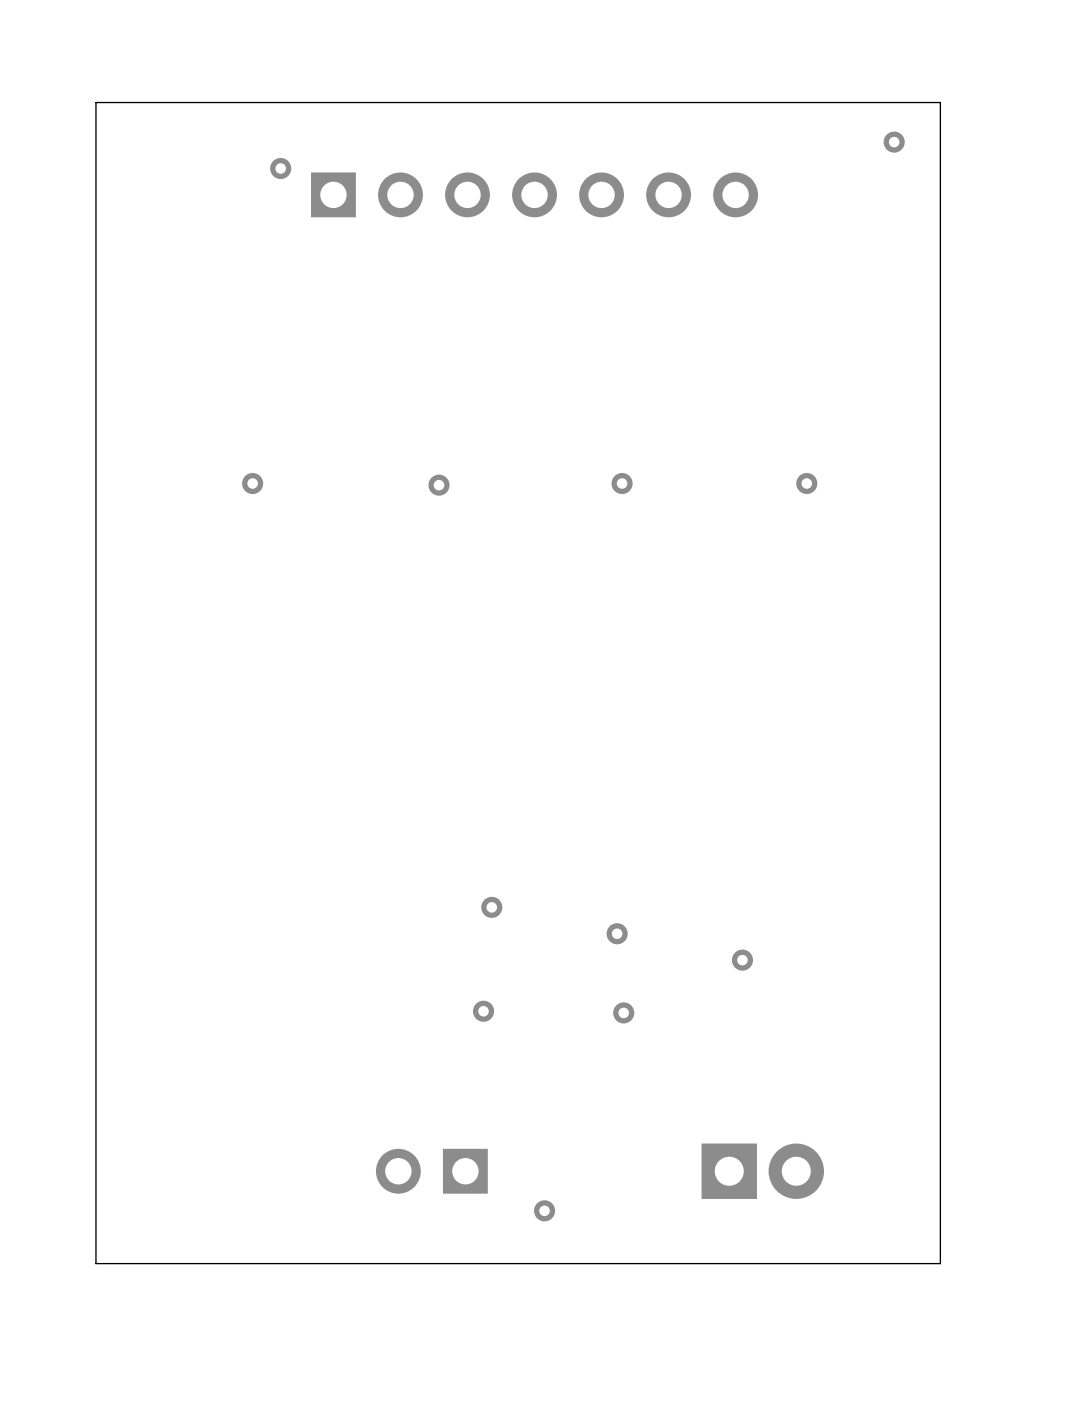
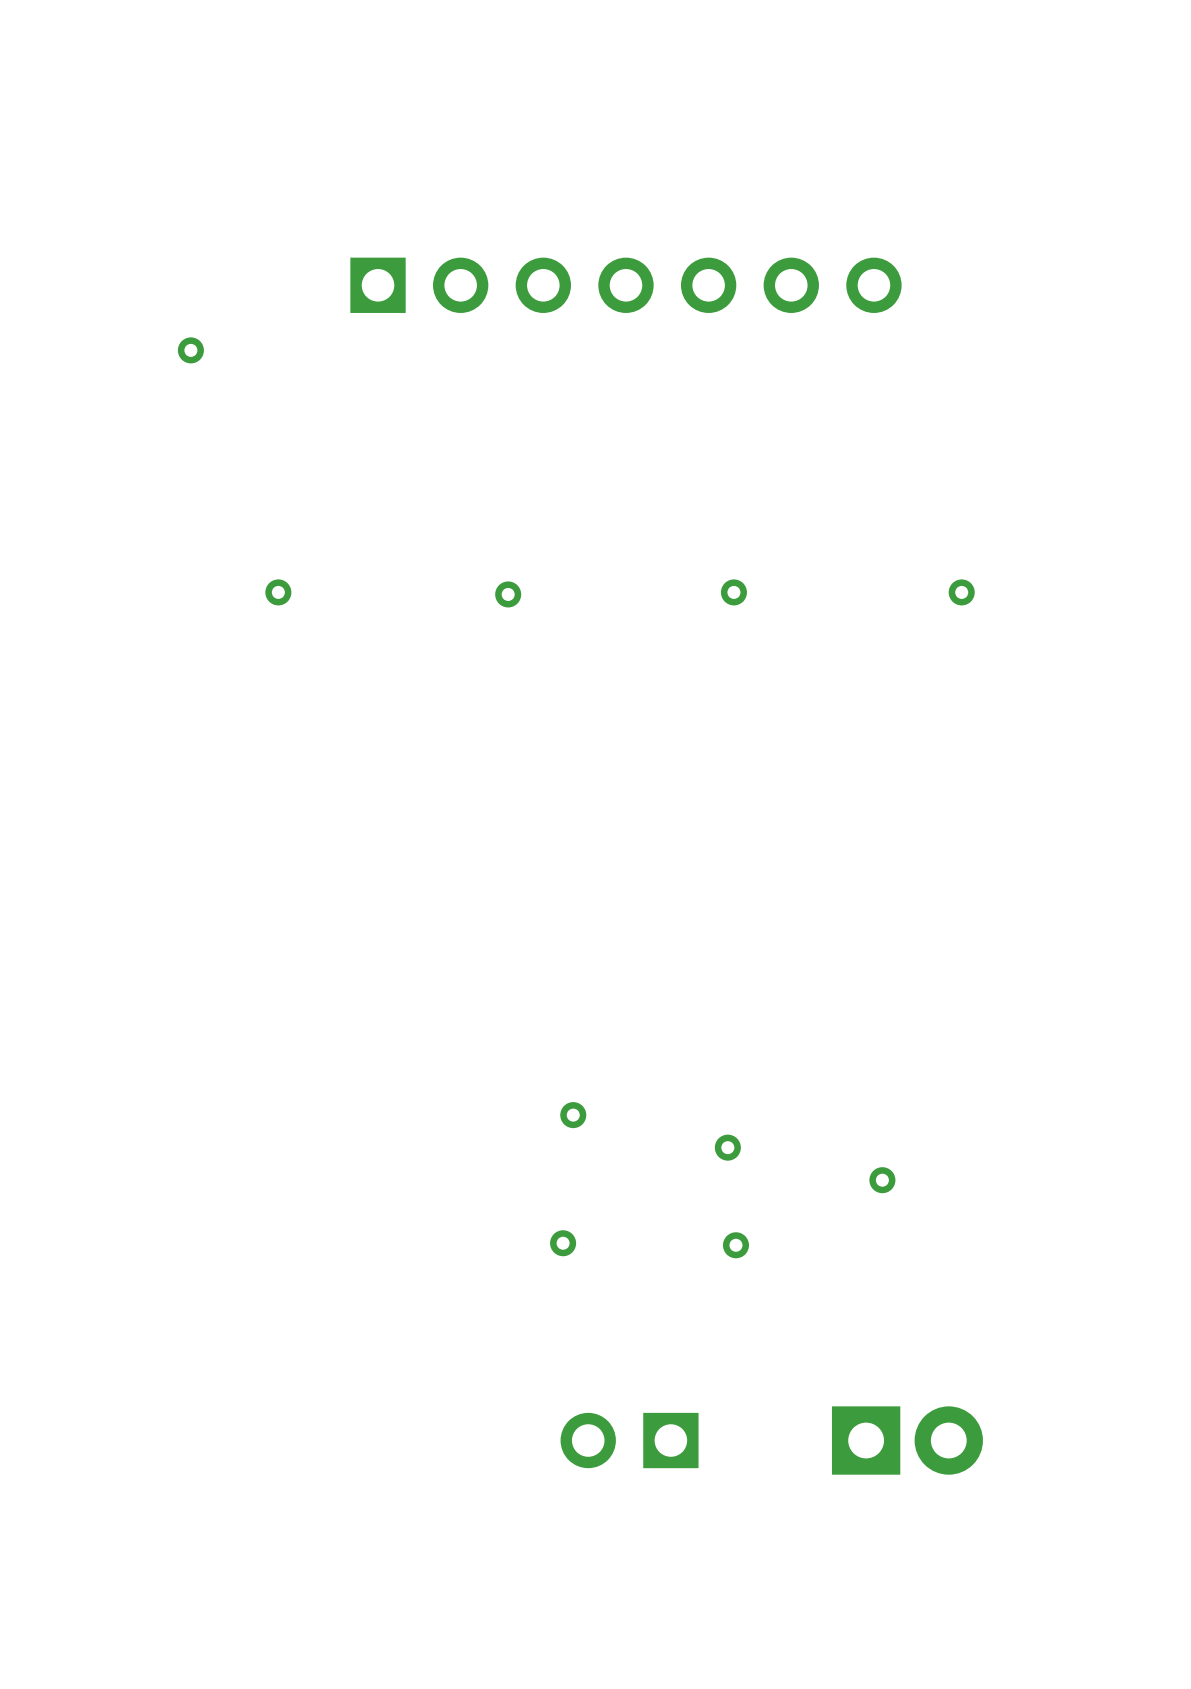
board edge: (940, 102) (940, 1263) (95, 1263) (95, 102) (940, 102) -> none
via: (894, 142) -> none
via position: (280, 168) -> (190, 350)
part position: (534, 194) -> (625, 285)
part position: (431, 1171) -> (629, 1440)
via: (544, 1210) -> none

